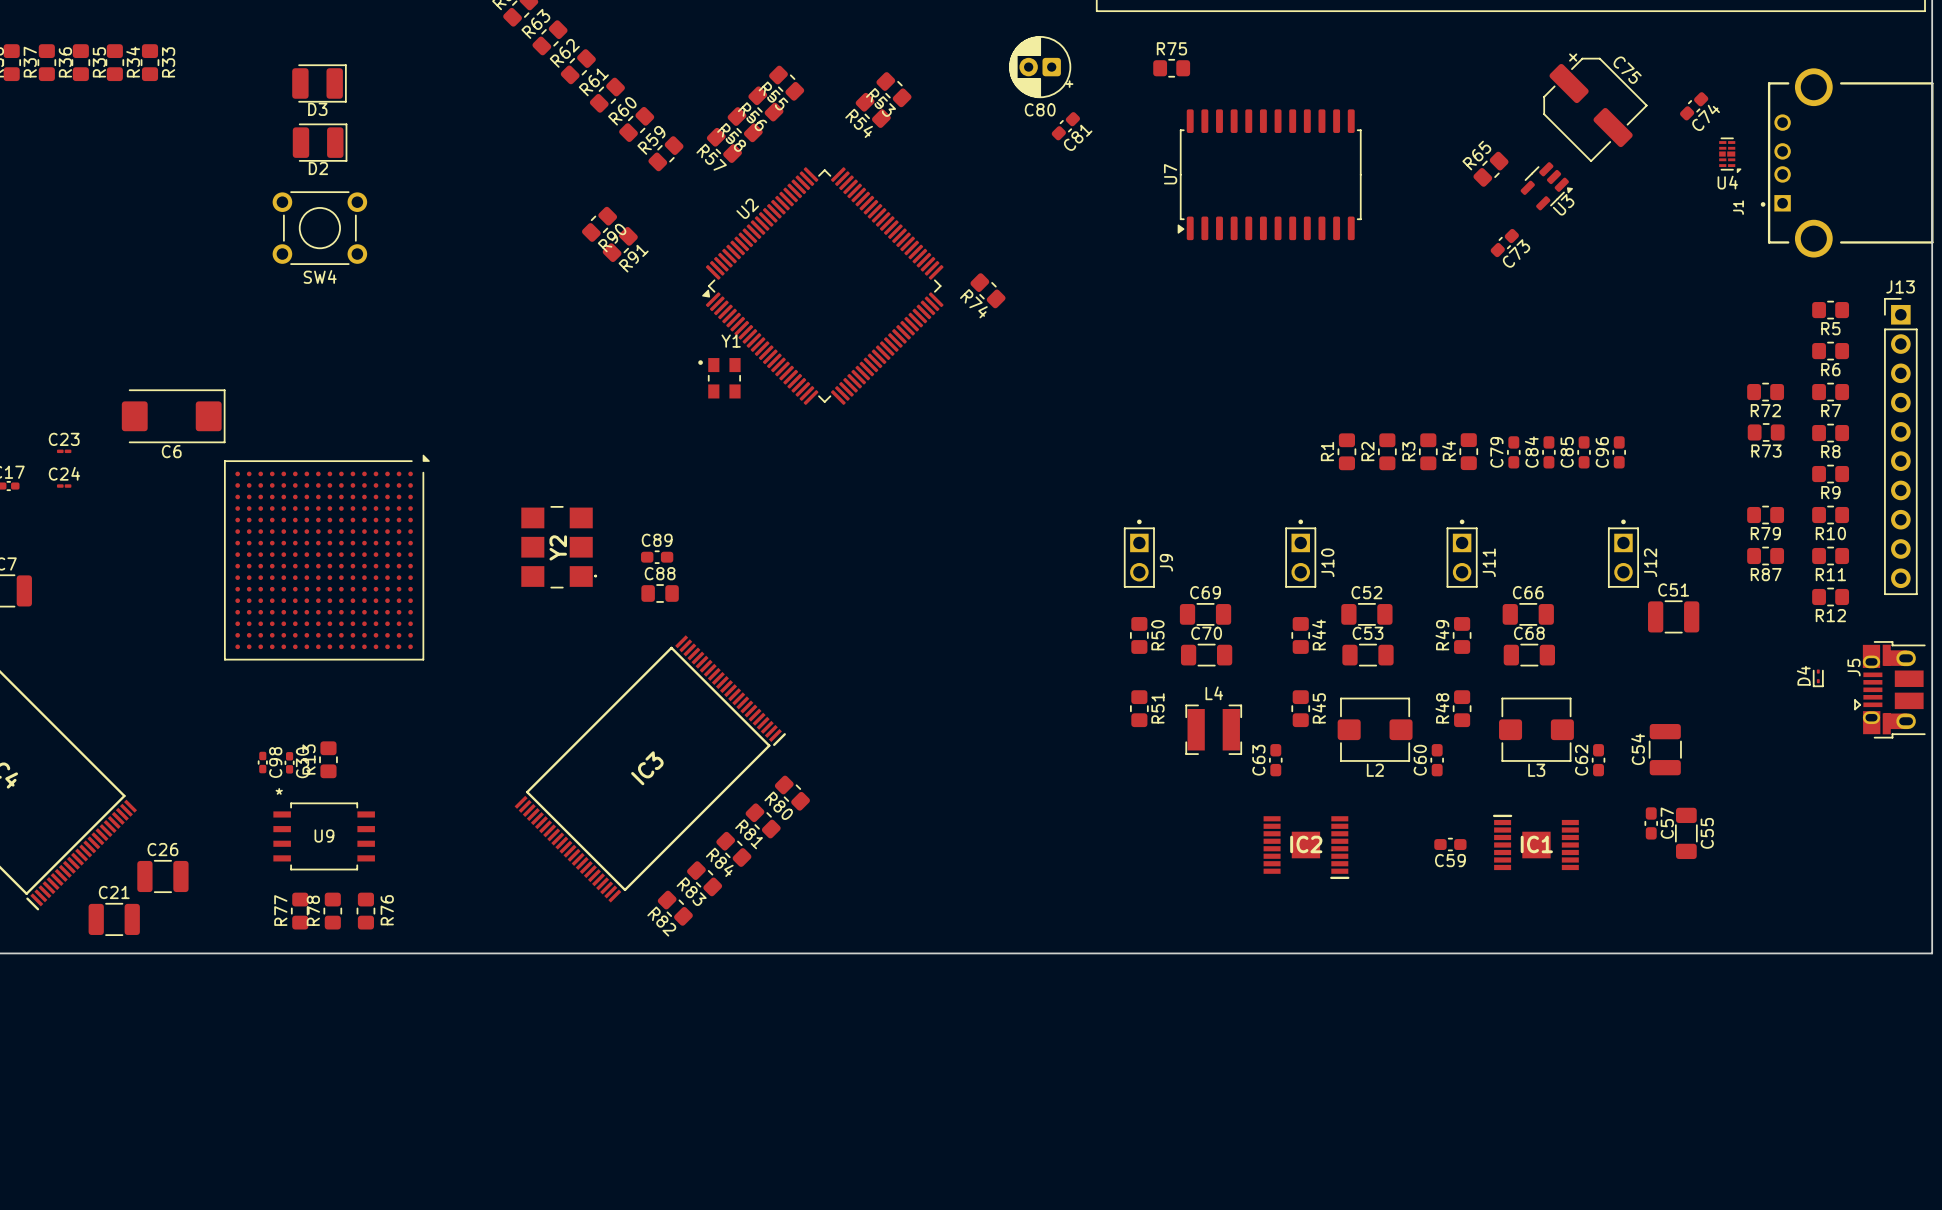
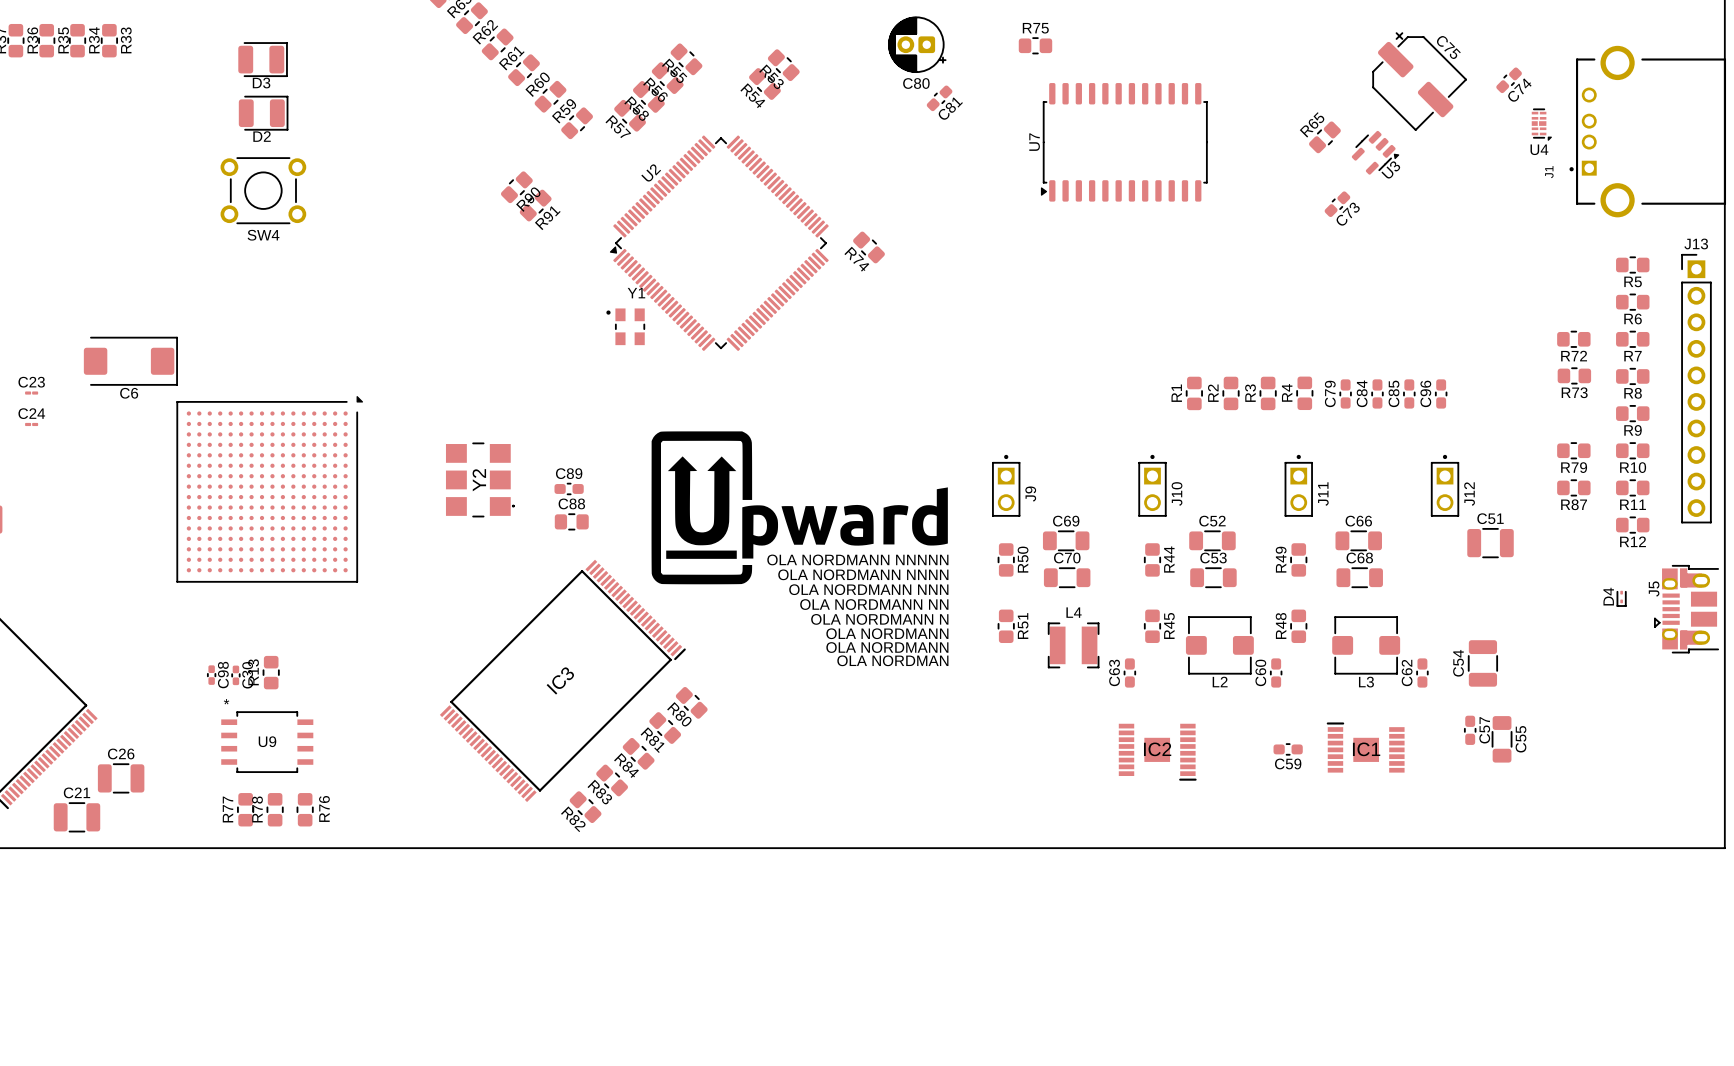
drawing: none -> [651, 431, 948, 585]
text: none -> OLA NORDMANN NNNNN (857, 559)
text: none -> OLA NORDMANN NNNN (863, 574)
text: none -> OLA NORDMANN NNN (868, 589)
text: none -> OLA NORDMANN NN (874, 604)
text: none -> OLA NORDMANN N (879, 619)
text: none -> OLA NORDMANN (887, 633)
text: none -> OLA NORDMANN (887, 647)
text: none -> OLA NORDMAN (892, 660)

